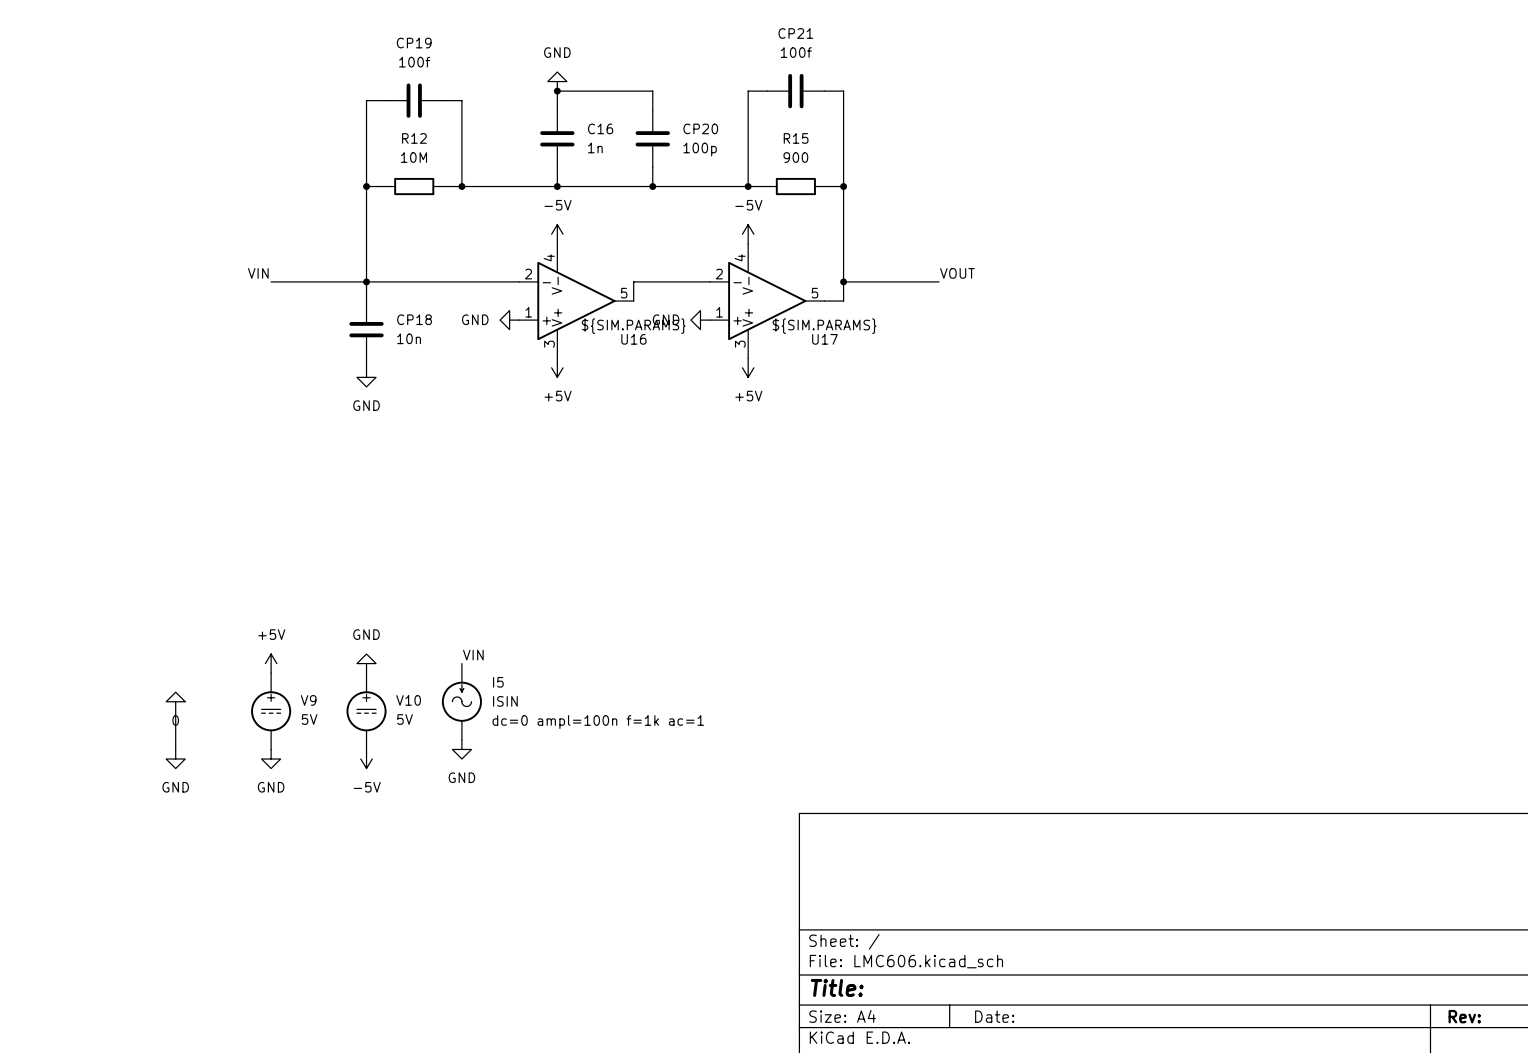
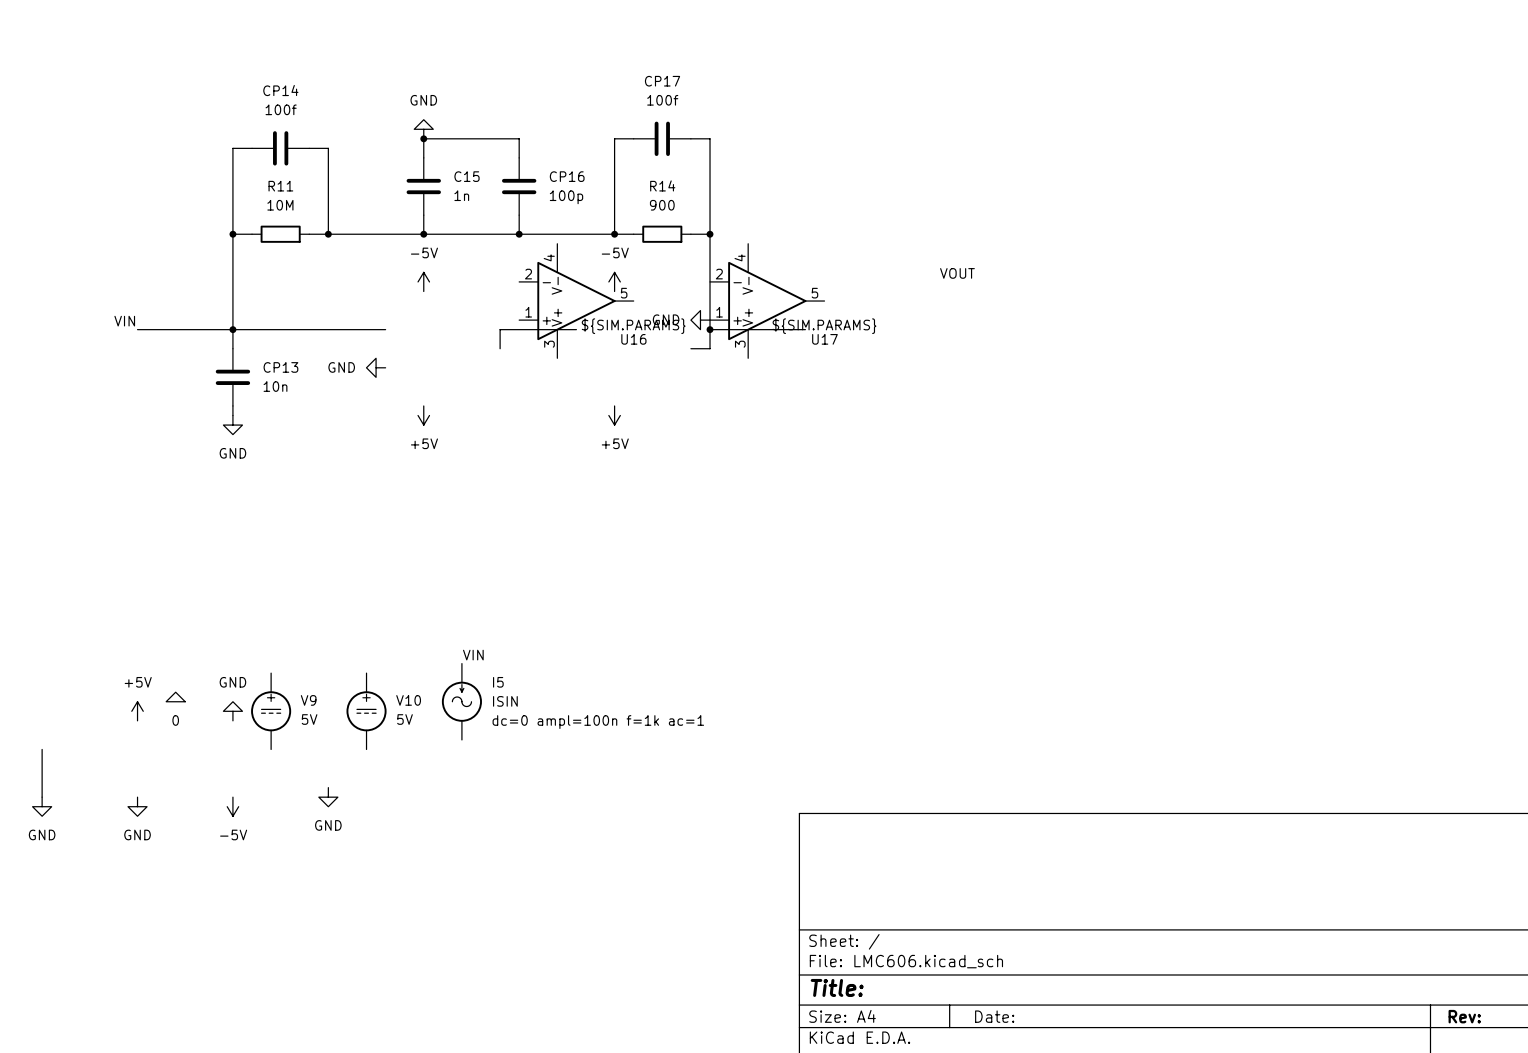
power symbol: GND (557, 81) -> none
junction: (557, 91) -> none
wire: (767, 91) (748, 91) (748, 186) -> (633, 138) (614, 138) (614, 234)
CP21: 100f (795, 91) -> none
wire: (824, 91) (843, 91) (843, 301) (824, 301) -> (690, 138) (710, 138) (710, 348) (690, 348)
wire: (385, 100) (366, 100) (366, 301) -> (252, 148) (232, 148) (232, 348)
CP19: 100f (414, 100) -> none
wire: (442, 100) (461, 100) (461, 186) -> (309, 148) (328, 148) (328, 234)
wire: (557, 110) (557, 91) (652, 91) (652, 110) -> (423, 157) (423, 138) (519, 138) (519, 157)
power symbol: none -> GND (423, 129)
junction: none -> (423, 138)
C16: 1n (557, 138) -> none
CP20: 100p (652, 138) -> none
CP17: none -> 100f (662, 138)
CP14: none -> 100f (280, 148)
wire: (557, 167) (557, 186) -> (423, 215) (423, 234)
wire: (652, 167) (652, 186) -> (519, 215) (519, 234)
wire: (366, 186) (385, 186) -> (232, 234) (252, 234)
junction: (366, 186) -> none
R12: 10M (414, 186) -> none
C15: none -> 1n (423, 186)
wire: (442, 186) (767, 186) -> (309, 234) (633, 234)
junction: (461, 186) -> none
CP16: none -> 100p (519, 186)
junction: (557, 186) -> none
junction: (652, 186) -> none
junction: (748, 186) -> none
R15: 900 (795, 186) -> none
wire: (824, 186) (843, 186) -> (690, 234) (710, 234)
junction: (843, 186) -> none
junction: none -> (232, 234)
R11: none -> 10M (280, 234)
junction: none -> (328, 234)
junction: none -> (423, 234)
junction: none -> (519, 234)
power symbol: -5V (557, 234) -> none
junction: none -> (614, 234)
R14: none -> 900 (662, 234)
junction: none -> (710, 234)
power symbol: -5V (748, 234) -> none
label position: VIN (258, 273) -> VIN (124, 321)
wire: (271, 281) (519, 281) -> (137, 329) (385, 329)
junction: (366, 281) -> none
power symbol: none -> -5V (423, 281)
power symbol: none -> -5V (614, 281)
wire: (710, 281) (633, 281) (633, 301) -> (576, 329) (500, 329) (500, 348)
wire: (843, 281) (939, 281) -> (710, 329) (805, 329)
junction: (843, 281) -> none
power symbol: GND (509, 320) -> none
junction: none -> (232, 329)
CP18: 10n (366, 329) -> none
junction: none -> (710, 329)
wire: (366, 358) (366, 367) -> (232, 405) (232, 415)
power symbol: +5V (557, 367) -> none
power symbol: +5V (748, 367) -> none
CP13: none -> 10n (232, 377)
power symbol rotation: 0° (366, 377) -> 90° clockwise (376, 367)
power symbol position: GND (366, 377) -> GND (376, 367)
power symbol: none -> +5V (423, 415)
power symbol: none -> +5V (614, 415)
power symbol: none -> GND (232, 425)
power symbol position: +5V (271, 663) -> +5V (137, 711)
power symbol: GND (366, 663) -> none
wire: (175, 701) (175, 749) -> (42, 749) (42, 797)
power symbol: none -> GND (232, 711)
power symbol: GND (461, 749) -> none
power symbol: GND (175, 759) -> none
power symbol: GND (271, 759) -> none
power symbol position: -5V (366, 759) -> -5V (232, 806)
power symbol: none -> GND (328, 797)
power symbol: none -> GND (42, 806)
power symbol: none -> GND (137, 806)

